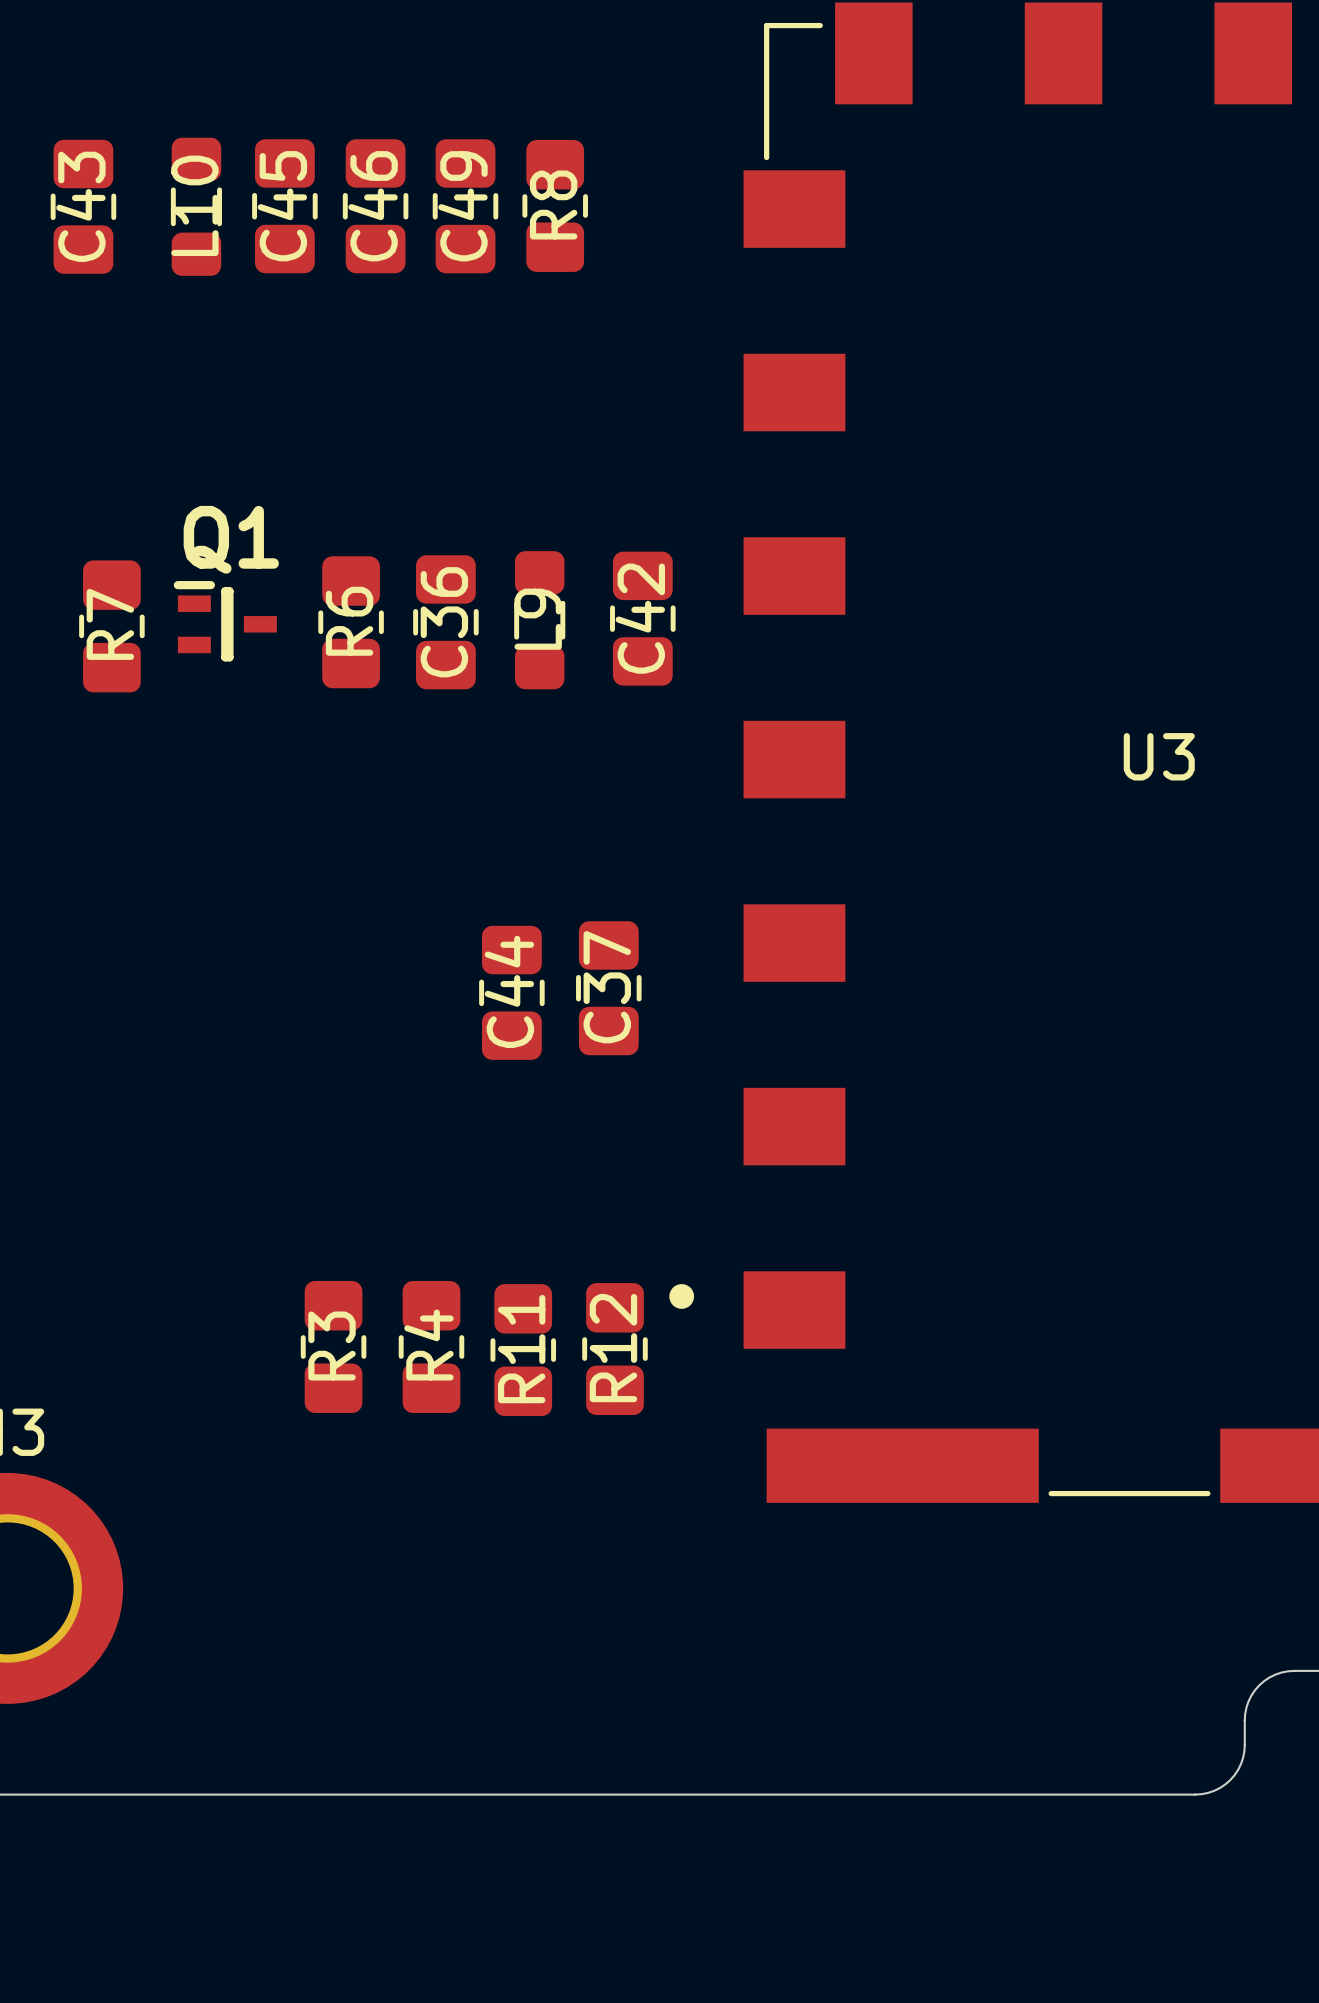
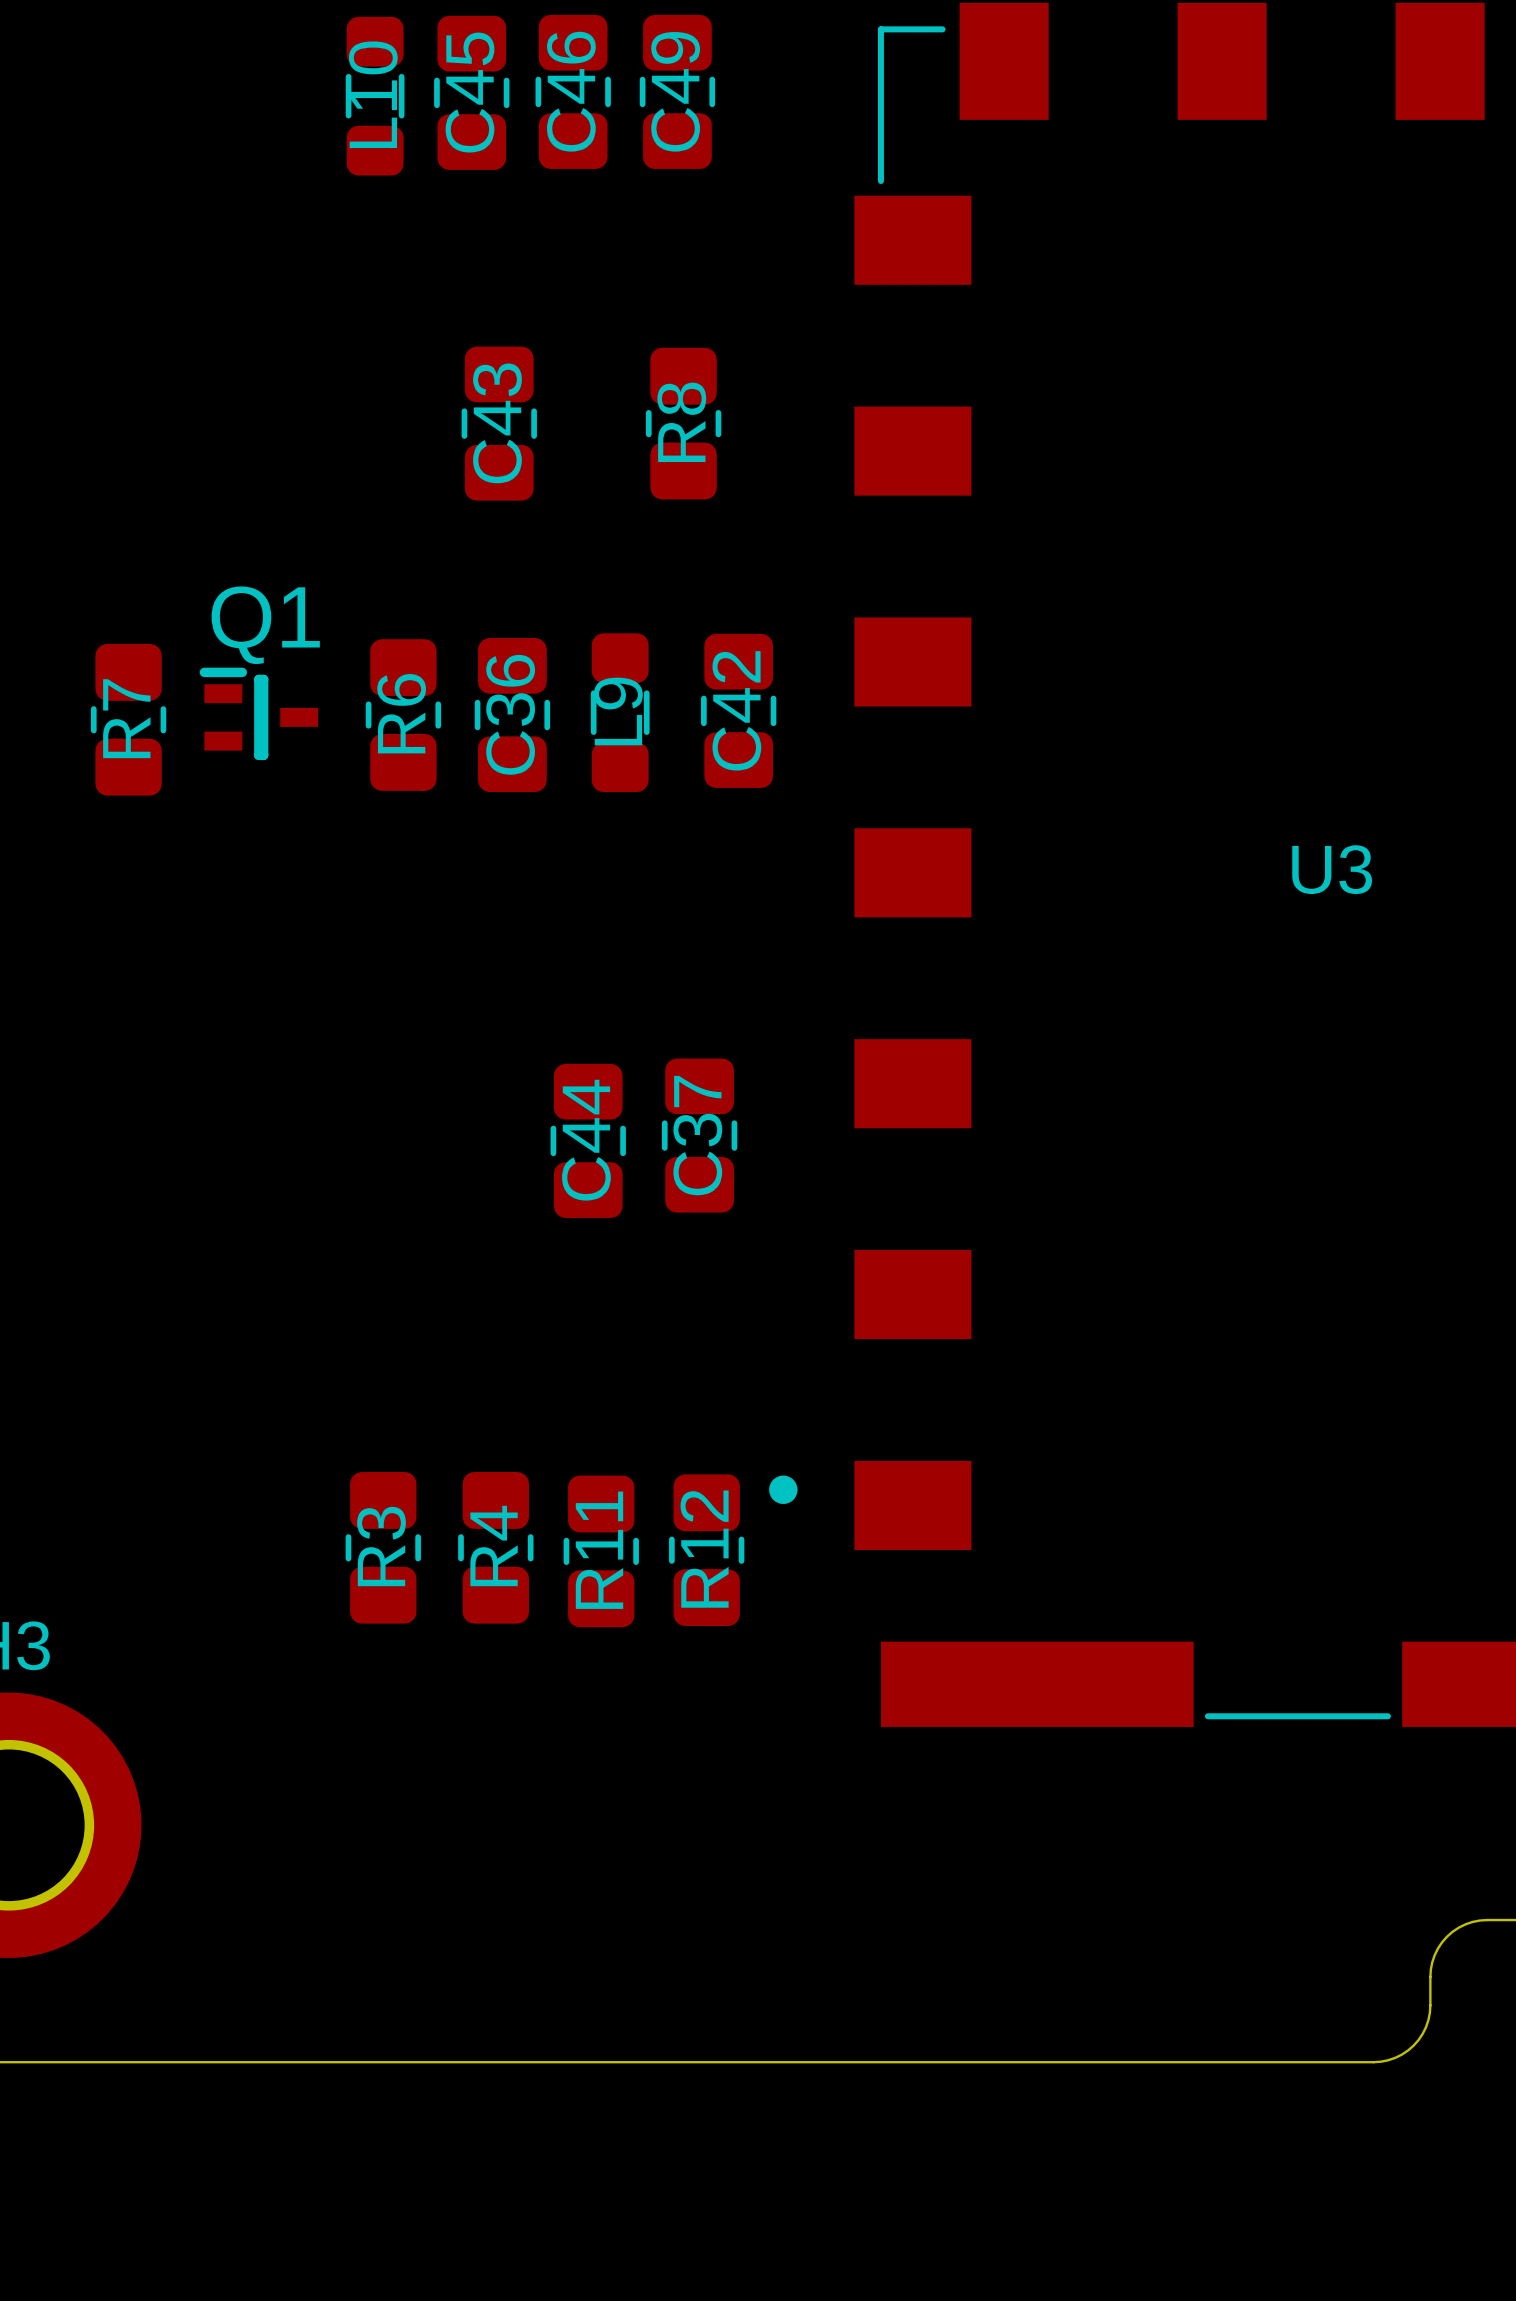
R8 position: (555, 205) -> (683, 423)
C43 position: (83, 206) -> (499, 423)
L10 position: (196, 206) -> (375, 96)
C45 position: (284, 206) -> (471, 92)
C46 position: (375, 206) -> (573, 91)
C49 position: (465, 206) -> (677, 91)

